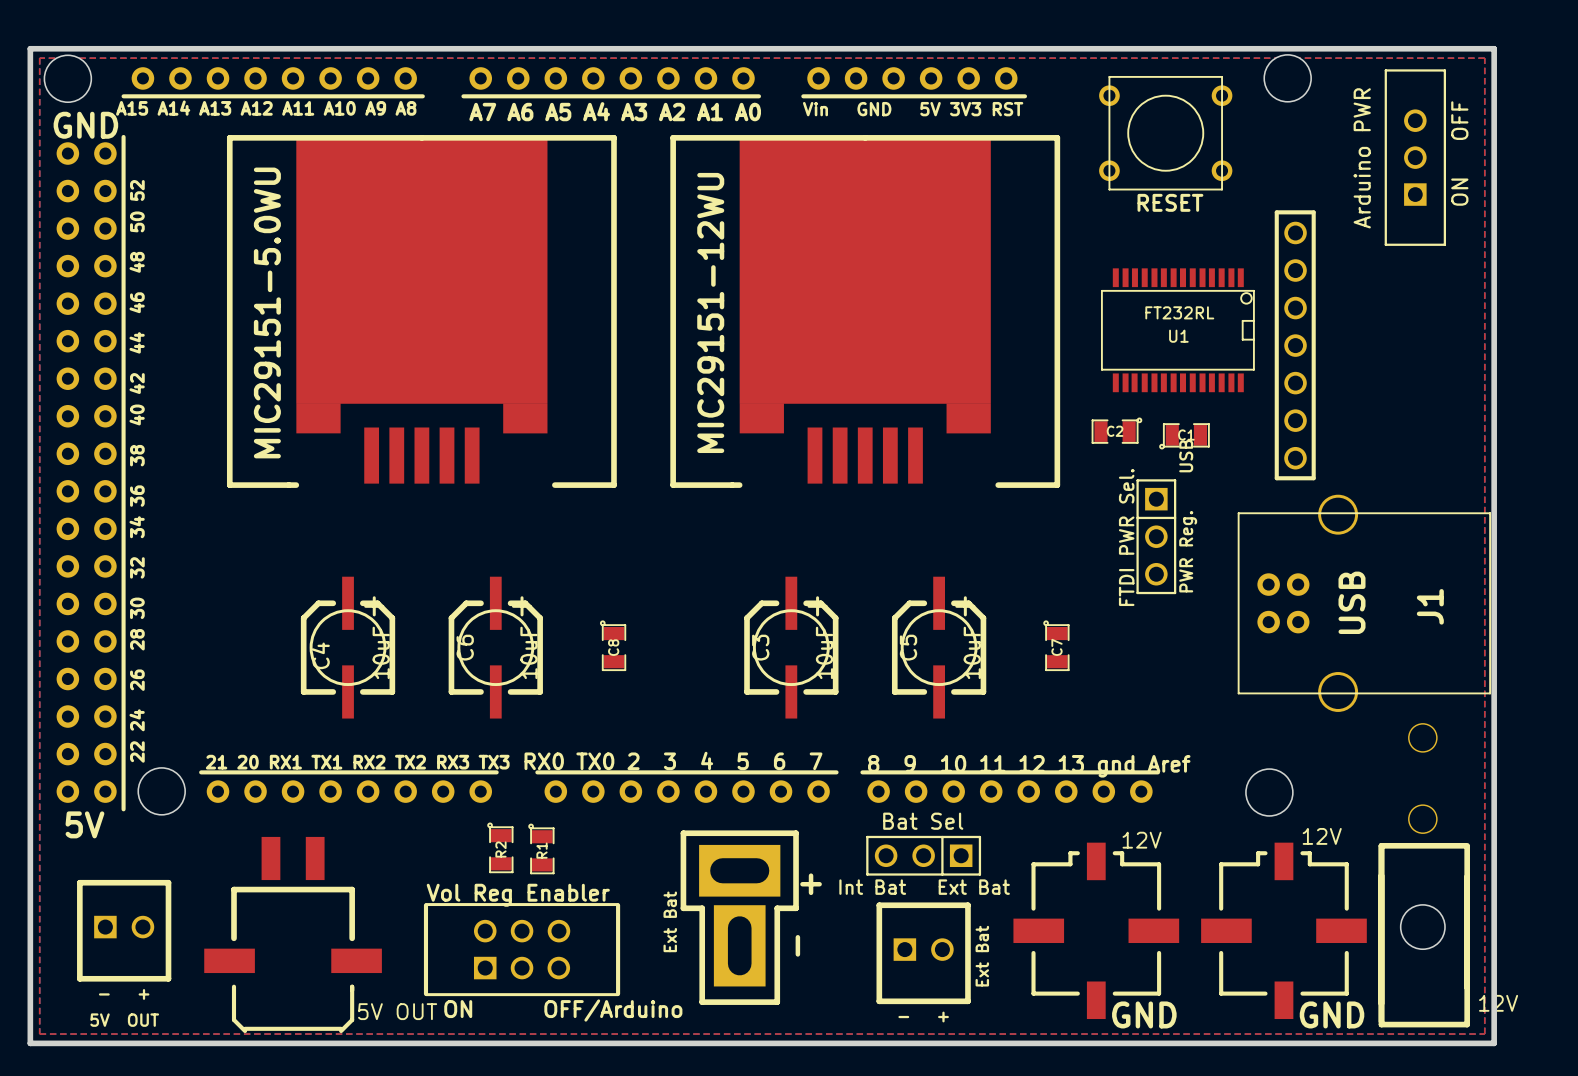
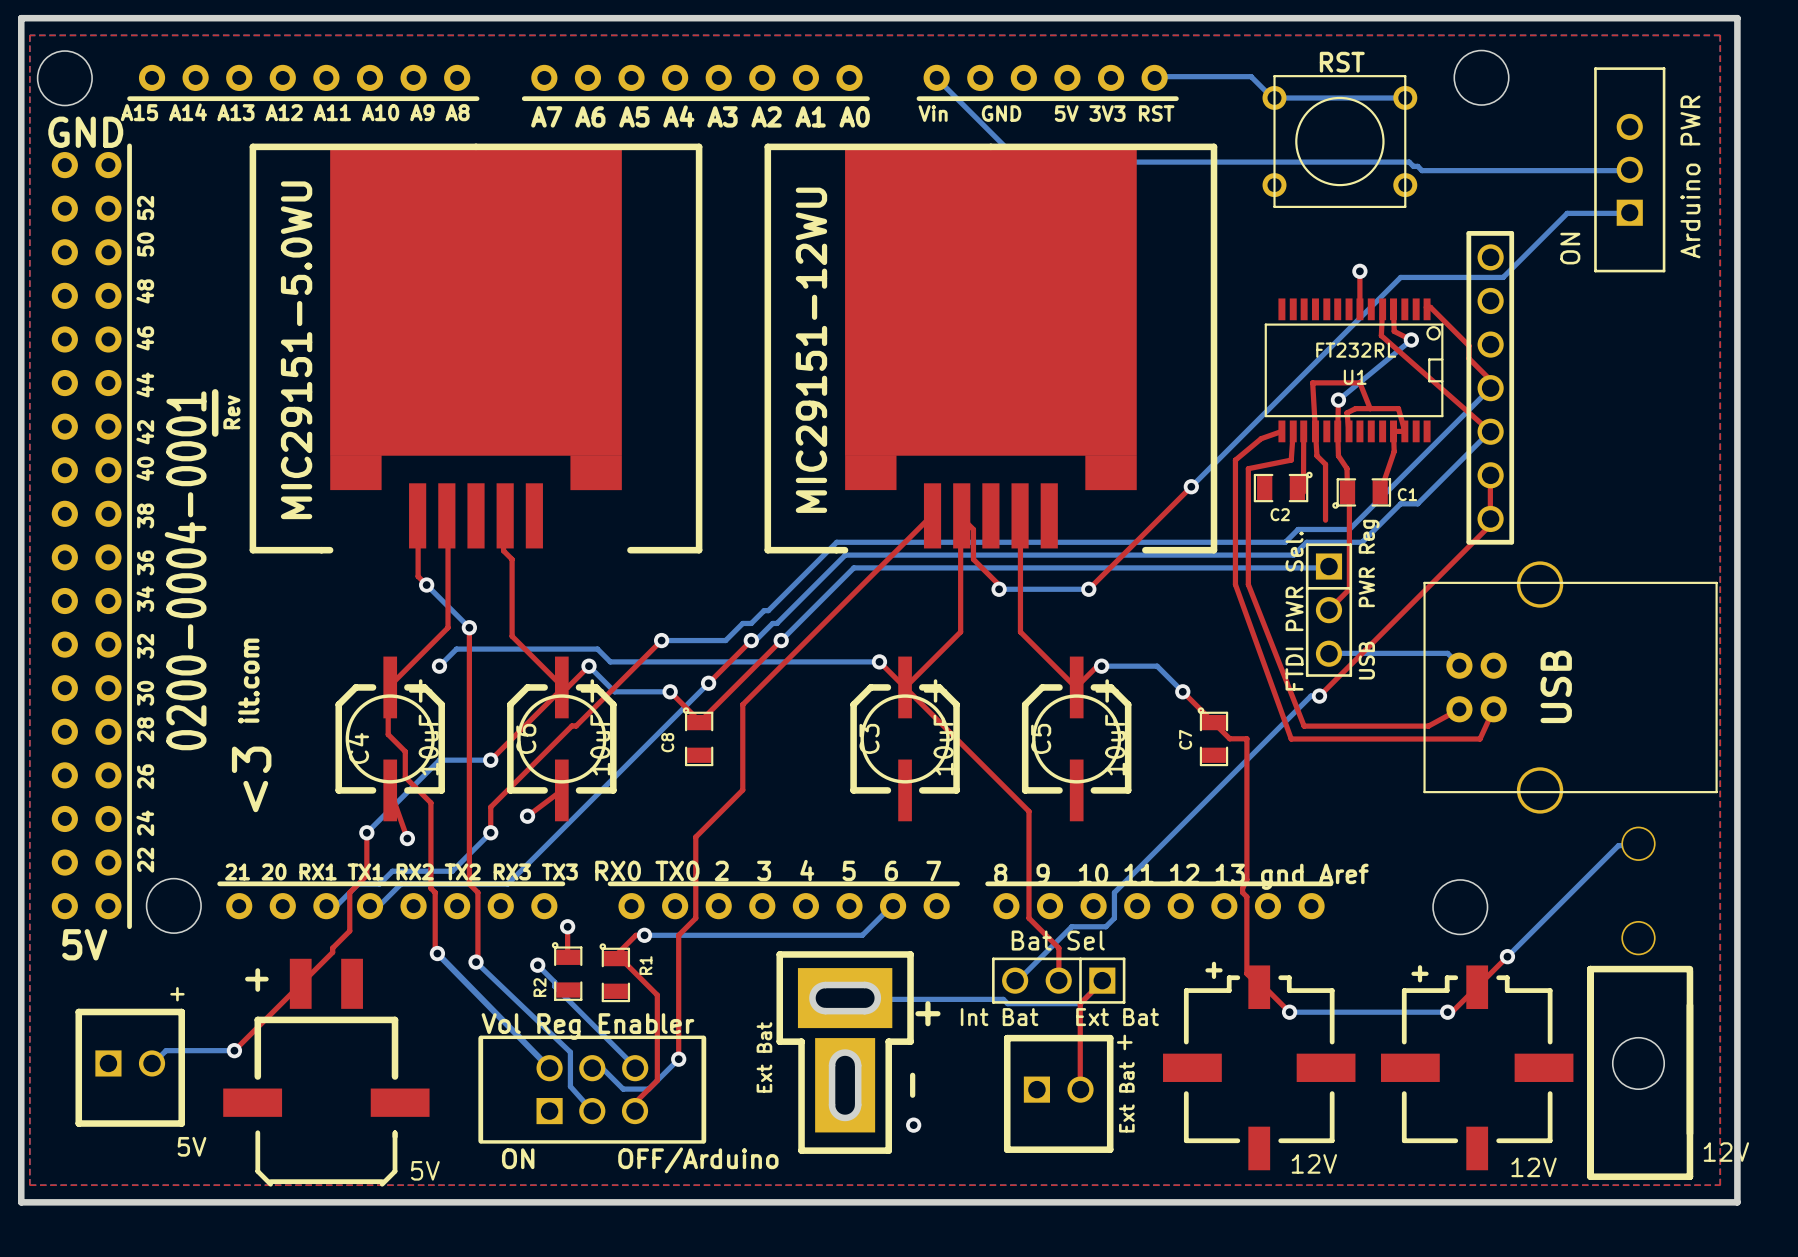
board edge: (30, 48) (1494, 48) (1494, 1043) (30, 1043) -> (21, 43) (21, 18) (1737, 18) (1737, 1202) (21, 1202) (21, 1198)
top zone outline: (39, 58) (1484, 58) (1484, 1034) (39, 1034) (39, 58) -> (29, 35) (29, 1185) (1720, 1185) (1720, 35) (29, 35)
bottom track: none -> (936, 77) (935, 76) (1020, 162) (1409, 162) (1422, 170) (1631, 170) (1629, 169)
bottom track: none -> (1154, 77) (1152, 76) (1251, 76) (1272, 98)
bottom track: none -> (1405, 97) (1272, 98)
Arduino PWR value: ON OFF (1459, 153) -> ON (1570, 248)
Arduino PWR name position: Arduino PWR (1362, 158) -> Arduino PWR (1690, 176)
bottom track: none -> (1629, 212) (1631, 213) (1567, 213) (1503, 277) (1400, 277) (1191, 486)
part value: RESET (1170, 202) -> RST (1342, 62)
top track: none -> (1359, 271) (1359, 309)
via: none -> (1359, 271)
top track: none -> (1382, 309) (1381, 335) (1490, 431)
top track: none -> (1393, 309) (1394, 331) (1411, 339)
top track: none -> (1427, 309) (1426, 307) (1430, 307) (1469, 345) (1469, 358) (1490, 379) (1490, 388)
bottom track: none -> (1411, 339) (1338, 400)
via: none -> (1411, 339)
bottom track: none -> (1490, 388) (1349, 529) (1298, 529) (1285, 542) (836, 542) (768, 610) (764, 610) (751, 623) (742, 623) (725, 640) (661, 640)
line: none -> (215, 392) (215, 433)
top track: none -> (1338, 400) (1338, 455) (1346, 468) (1347, 492) (1349, 491) (1349, 589) (1328, 610)
via: none -> (1338, 400)
top track: none -> (1370, 408) (1359, 382) (1312, 382) (1316, 455) (1325, 464) (1325, 520)
text: none -> Rev (231, 412)
top track: none -> (1281, 431) (1261, 438) (1235, 460) (1235, 584) (1291, 739) (1480, 739) (1493, 709)
top track: none -> (1293, 431) (1291, 460) (1248, 468) (1248, 584) (1304, 726) (1428, 726) (1459, 709)
top track: none -> (1303, 431) (1303, 492)
top track: none -> (1349, 431) (1346, 412) (1355, 408) (1398, 408) (1404, 431) (1393, 431) (1394, 451) (1380, 492)
bottom track: none -> (1490, 431) (1417, 503) (1400, 503) (1362, 542) (1306, 542) (1293, 555) (845, 555) (776, 623) (772, 623) (755, 640) (751, 640)
top track: none -> (1490, 475) (1490, 525) (1319, 696)
top track: none -> (1191, 486) (1088, 589)
via: none -> (1191, 486)
C2 name position: C2 (1115, 431) -> C2 (1280, 514)
C1 name position: C1 (1186, 435) -> C1 (1407, 494)
top track: none -> (417, 515) (418, 576) (426, 585)
top track: none -> (446, 515) (448, 627) (388, 687)
top track: none -> (505, 515) (503, 516) (503, 550) (512, 559) (512, 636) (563, 687)
top track: none -> (932, 515) (742, 704) (742, 790) (695, 837) (695, 918) (678, 935) (678, 1059)
top track: none -> (1020, 515) (1020, 632) (1075, 687)
top track: none -> (960, 516) (973, 529) (973, 559) (999, 585) (999, 589)
top track: none -> (960, 516) (960, 632) (905, 687)
bottom track: none -> (1328, 566) (853, 567) (781, 640)
text: none -> 0200-0004-0001 (185, 570)
bottom track: none -> (426, 585) (469, 627)
via: none -> (426, 585)
PWR Reg. USB name: PWR Reg. USB (1188, 516) -> USB PWR Reg (1369, 599)
bottom track: none -> (999, 589) (1088, 589)
via: none -> (999, 589)
via: none -> (1088, 589)
top track: none -> (469, 627) (469, 884) (477, 892) (477, 960) (476, 962)
via: none -> (469, 627)
top track: none -> (661, 640) (576, 725) (571, 725) (490, 807) (490, 832)
via: none -> (661, 640)
top track: none -> (751, 640) (708, 683)
via: none -> (751, 640)
top track: none -> (781, 640) (700, 721)
via: none -> (781, 640)
bottom track: none -> (1328, 653) (1447, 653) (1459, 665)
top track: none -> (879, 661) (1029, 811) (1029, 918) (1058, 948) (1058, 982) (1058, 980)
bottom track: none -> (879, 661) (610, 661) (597, 649) (456, 649) (439, 666)
via: none -> (879, 661)
via: none -> (439, 666)
top track: none -> (588, 666) (567, 687) (563, 687)
bottom track: none -> (588, 666) (614, 691) (670, 691)
via: none -> (588, 666)
top track: none -> (1101, 666) (1097, 666) (1075, 687)
bottom track: none -> (1101, 666) (1157, 666) (1182, 691)
via: none -> (1101, 666)
text: none -> ilt.com (248, 681)
bottom track: none -> (708, 683) (507, 884) (401, 884) (379, 905) (369, 906)
via: none -> (708, 683)
top track: none -> (388, 687) (388, 734) (405, 751) (405, 777) (430, 802) (430, 888) (435, 892) (435, 952) (437, 953)
top track: none -> (563, 687) (490, 760)
J1 name: J1 (1430, 606) -> none
top track: none -> (670, 691) (700, 721)
via: none -> (670, 691)
top track: none -> (1182, 691) (1229, 738) (1246, 738) (1246, 879) (1242, 892) (1246, 896) (1246, 973) (1259, 986)
via: none -> (1182, 691)
bottom track: none -> (1319, 696) (1310, 696) (1114, 892) (1114, 918) (1105, 926) (1071, 926) (1016, 982) (1015, 980)
via: none -> (1319, 696)
C8 name position: C8 (613, 647) -> C8 (667, 742)
C7 name position: C7 (1056, 647) -> C7 (1185, 739)
bottom track: none -> (490, 760) (439, 760) (366, 832)
via: none -> (490, 760)
text: none -> <3 (251, 779)
top track: none -> (390, 790) (407, 838)
top track: none -> (561, 790) (527, 816)
via: none -> (527, 816)
top track: none -> (366, 832) (366, 875) (349, 892) (349, 931) (332, 948) (332, 952) (234, 1050)
via: none -> (366, 832)
bottom track: none -> (490, 832) (452, 871) (392, 871) (379, 884) (358, 884) (336, 905) (326, 906)
via: none -> (490, 832)
via: none -> (407, 838)
bottom track: none -> (1638, 843) (1639, 845) (1618, 845) (1507, 956)
bottom track: none -> (893, 906) (862, 935) (644, 935)
top track: none -> (567, 926) (568, 957)
via: none -> (567, 926)
top track: none -> (644, 935) (635, 935) (614, 956)
via: none -> (644, 935)
bottom track: none -> (437, 953) (549, 1068)
via: none -> (437, 953)
top track: none -> (614, 956) (618, 956) (657, 995) (657, 1080) (635, 1101) (635, 1111)
top track: none -> (1507, 956) (1451, 1012) (1447, 1012)
via: none -> (1507, 956)
12V name position: 12V (1322, 836) -> 12V (1534, 1167)
bottom track: none -> (476, 962) (570, 1052) (570, 1086) (592, 1111)
via: none -> (476, 962)
12V name position: 12V (1142, 840) -> 12V (1314, 1163)
bottom track: none -> (537, 965) (554, 982) (554, 986) (635, 1068)
via: none -> (537, 965)
12V text: none -> + (1214, 970)
R2 name position: R2 (500, 849) -> R2 (539, 987)
12V text: none -> + (1420, 973)
R1 name position: R1 (541, 850) -> R1 (645, 965)
top track: none -> (1102, 980) (1080, 1003) (1080, 1089)
bottom track: none -> (1102, 980) (1080, 1003) (1007, 1003) (1003, 999) (845, 998)
board edge: none -> (825, 985) (868, 985) (876, 991) (877, 1001) (873, 1007) (866, 1011) (822, 1010) (814, 1004) (812, 996) (816, 988) (825, 985)
top track: none -> (1259, 986) (1263, 986) (1289, 1012)
bottom track: none -> (1289, 1012) (1447, 1012)
via: none -> (1289, 1012)
via: none -> (1447, 1012)
bottom track: none -> (234, 1050) (166, 1050) (152, 1063)
via: none -> (234, 1050)
bottom track: none -> (678, 1059) (648, 1089) (623, 1089) (601, 1067) (592, 1068)
via: none -> (678, 1059)
board edge: none -> (858, 1065) (855, 1057) (846, 1052) (838, 1054) (832, 1062) (832, 1106) (835, 1114) (841, 1117) (851, 1116) (857, 1108) (858, 1065)
5V OUT: (293, 935) -> none
5V: none -> (326, 1072)
via: none -> (913, 1125)
5V OUT value: - + (124, 994) -> + (177, 994)
12V text: GND (1144, 1014) -> none
12V text: GND (1332, 1014) -> none
Ext Bat value: - + (923, 1017) -> + (1124, 1042)
5V OUT name: 5V OUT (124, 1020) -> 5V (191, 1146)

